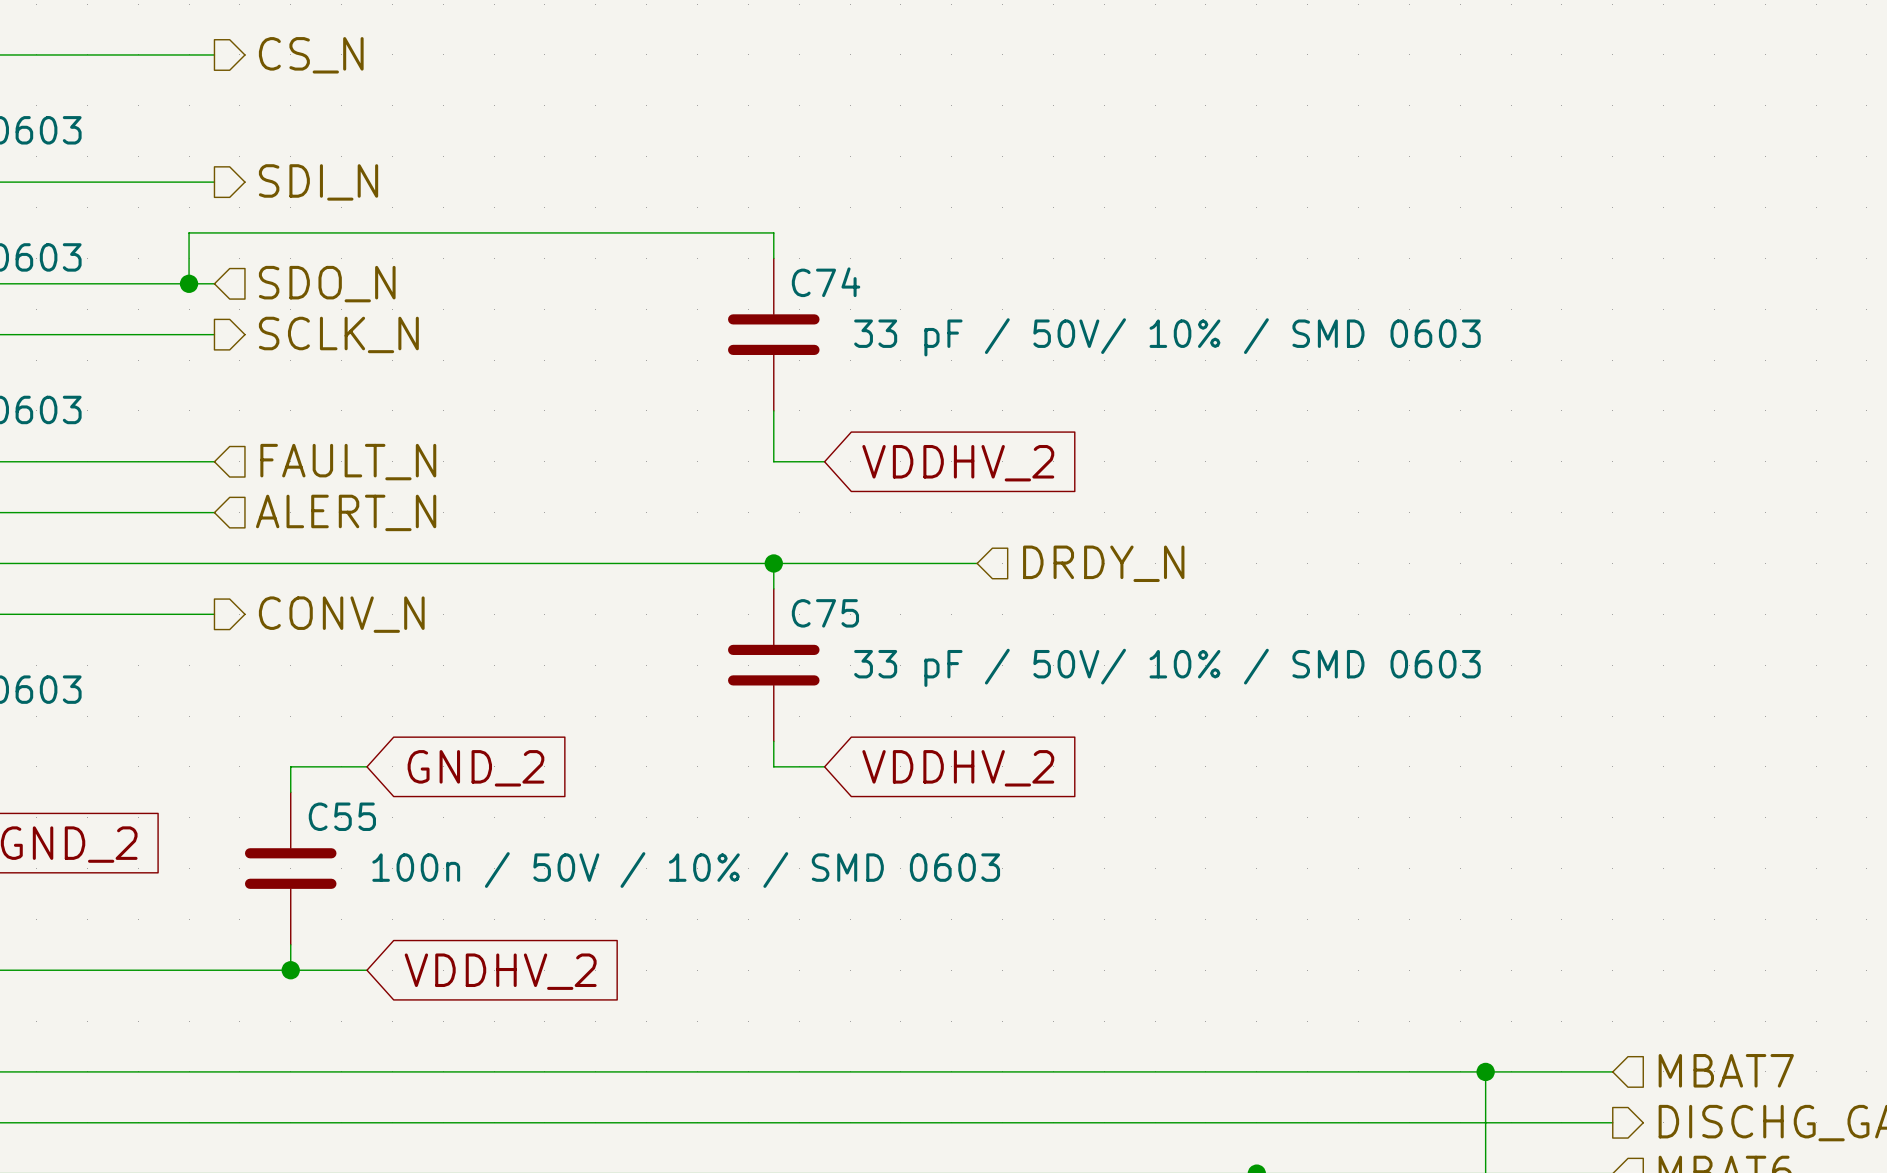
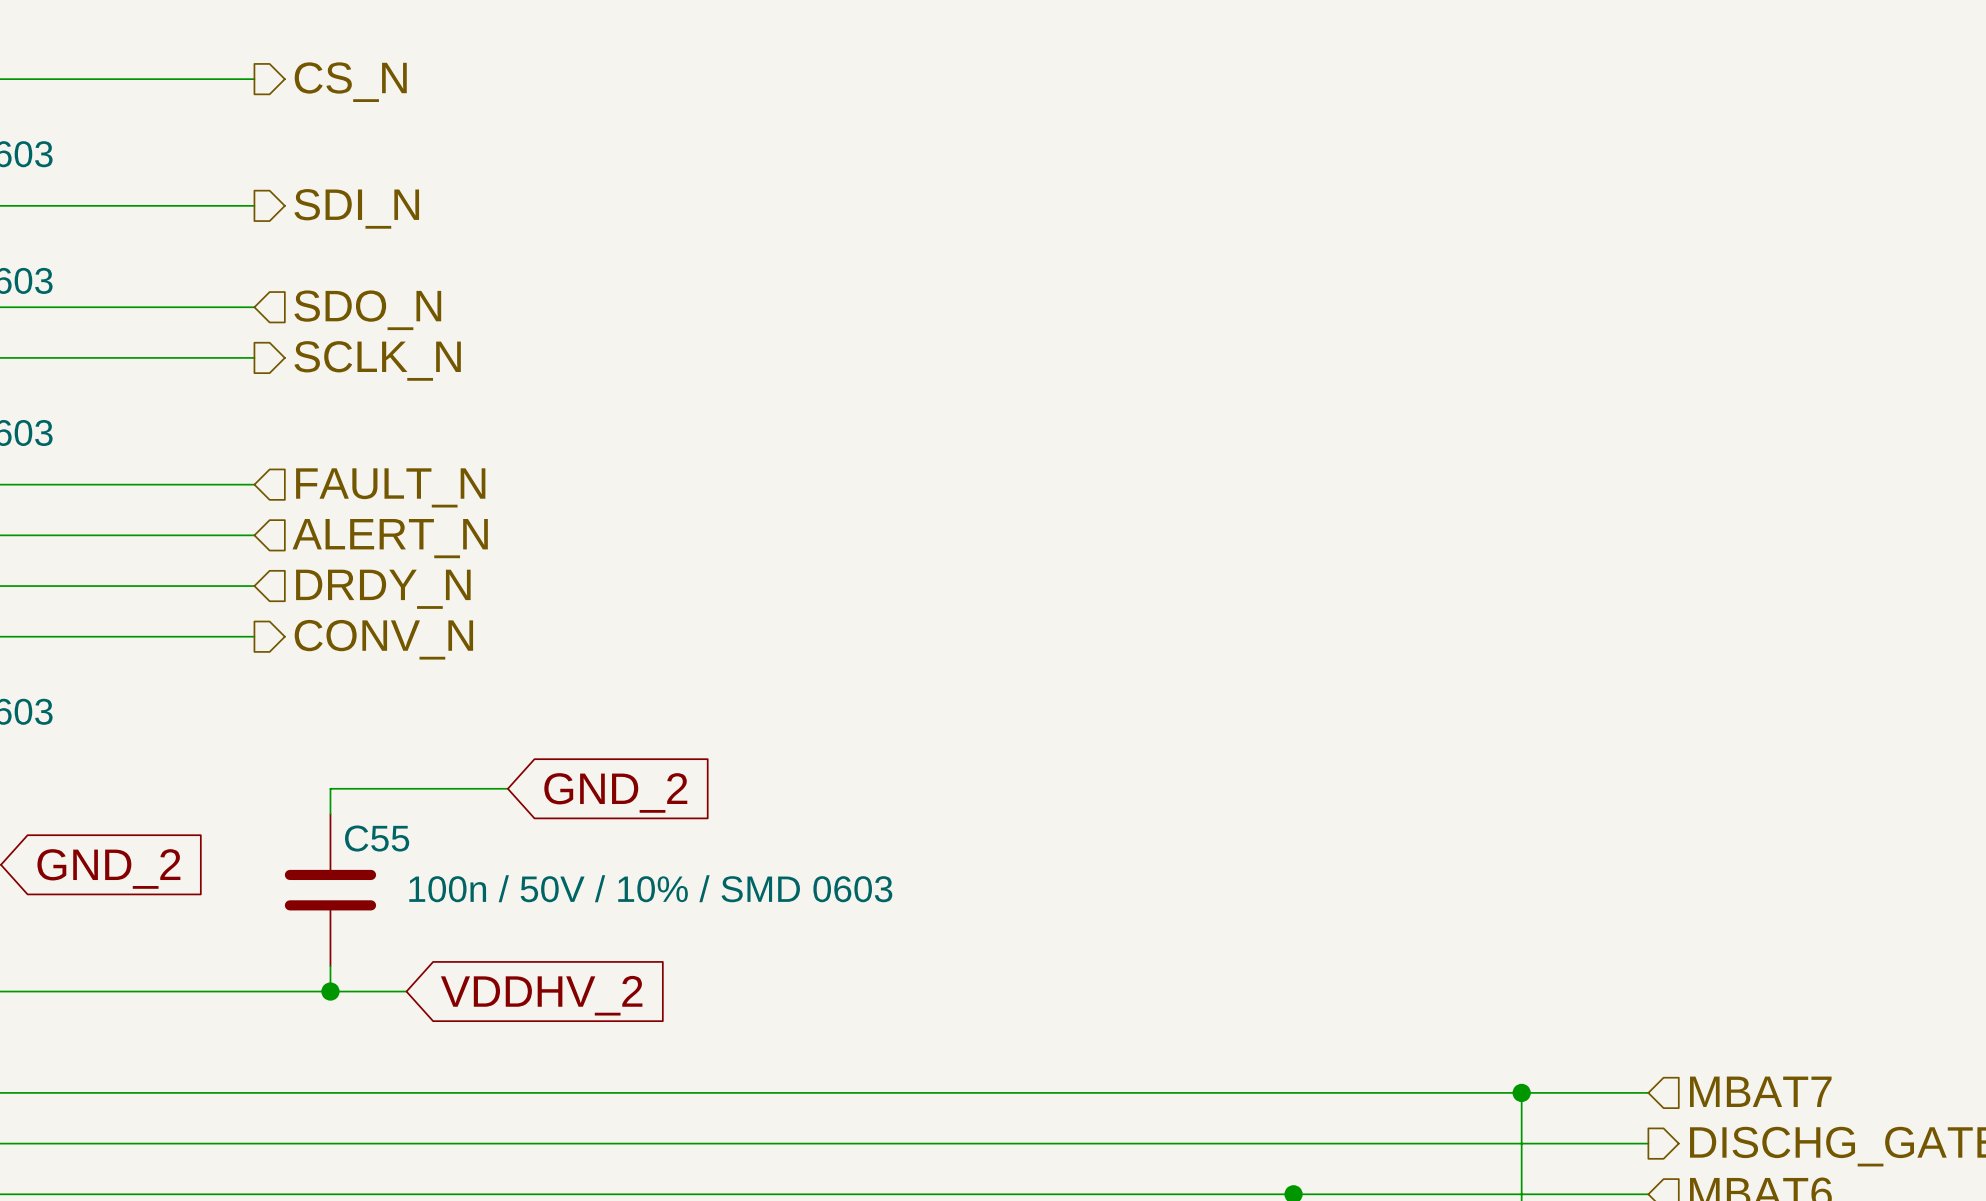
wire: (773, 258) (773, 232) (189, 232) (189, 283) -> none
junction: (189, 283) -> none
C74: 33 pF / 50V/ 10% / SMD 0603 (773, 334) -> none
wire: (773, 410) (773, 461) (824, 461) -> none
global label: VDDHV_2 (958, 463) -> none
wire: (214, 563) (977, 563) -> none
hierarchical label: none -> DRDY_N (383, 589)
wire: (773, 563) (773, 588) -> none
junction: (773, 563) -> none
hierarchical label: DRDY_N (1103, 563) -> none
C75: 33 pF / 50V/ 10% / SMD 0603 (773, 665) -> none
wire: (773, 741) (773, 766) (824, 766) -> none
wire: none -> (406, 788) (507, 788)
global label position: GND_2 (475, 768) -> GND_2 (615, 792)
global label: VDDHV_2 (958, 768) -> none

